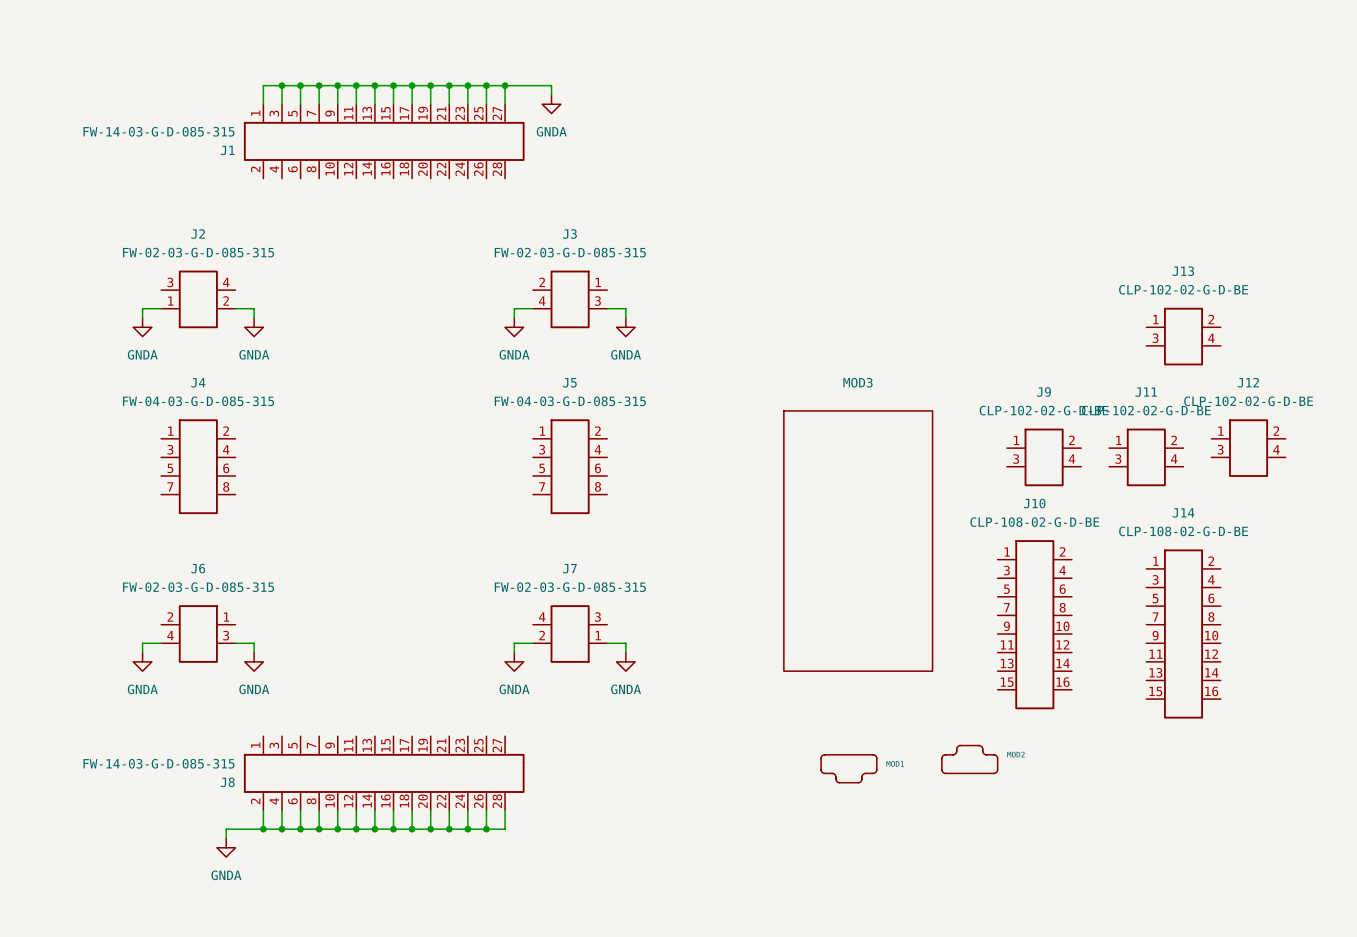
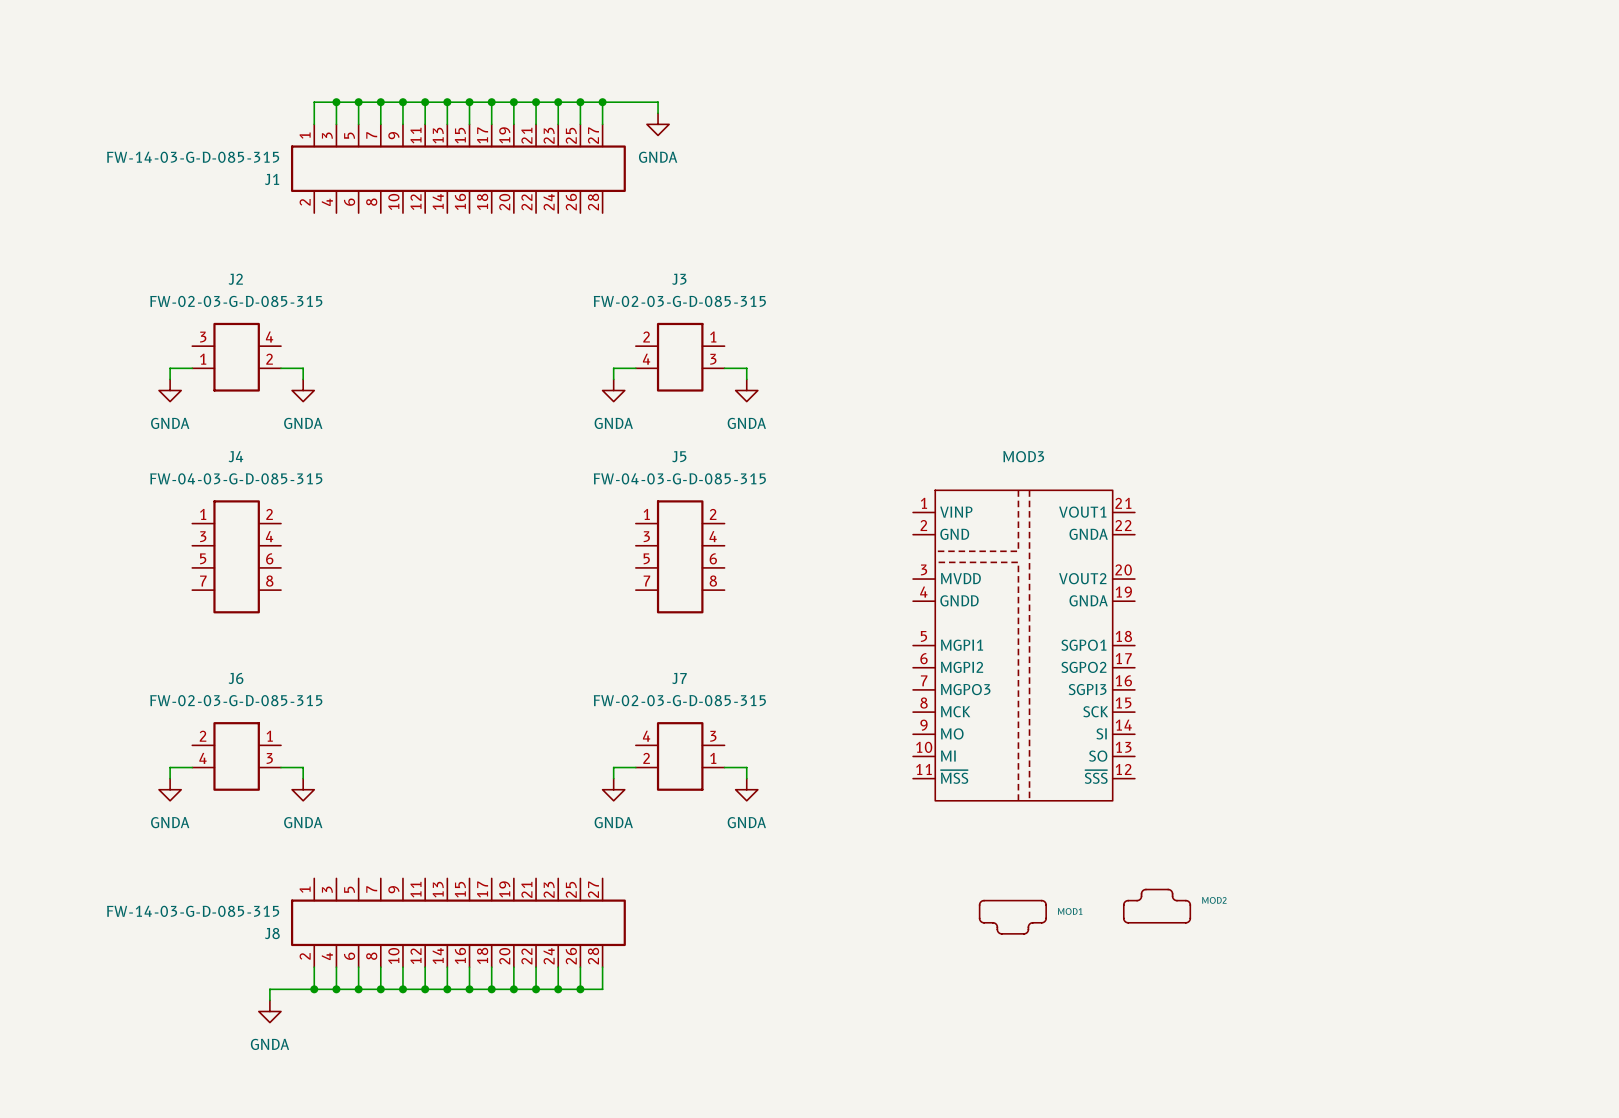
J13: CLP-102-02-G-D-BE (1183, 336) -> none
MOD3 symbol: [783, 410, 933, 672] -> [913, 490, 1135, 801]
J12: CLP-102-02-G-D-BE (1248, 448) -> none
J9: CLP-102-02-G-D-BE (1044, 457) -> none
J11: CLP-102-02-G-D-BE (1146, 457) -> none
J10: CLP-108-02-G-D-BE (1034, 624) -> none
J14: CLP-108-02-G-D-BE (1183, 634) -> none

